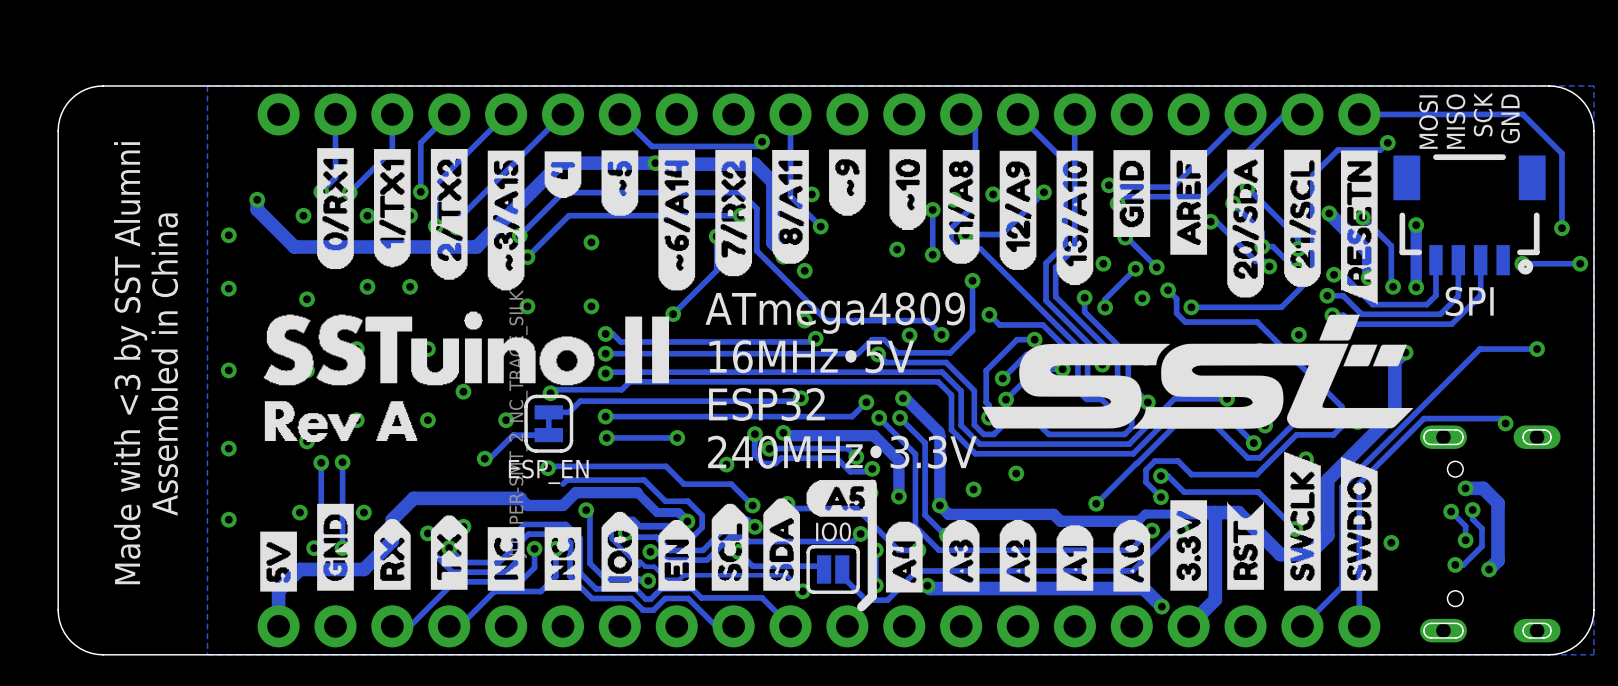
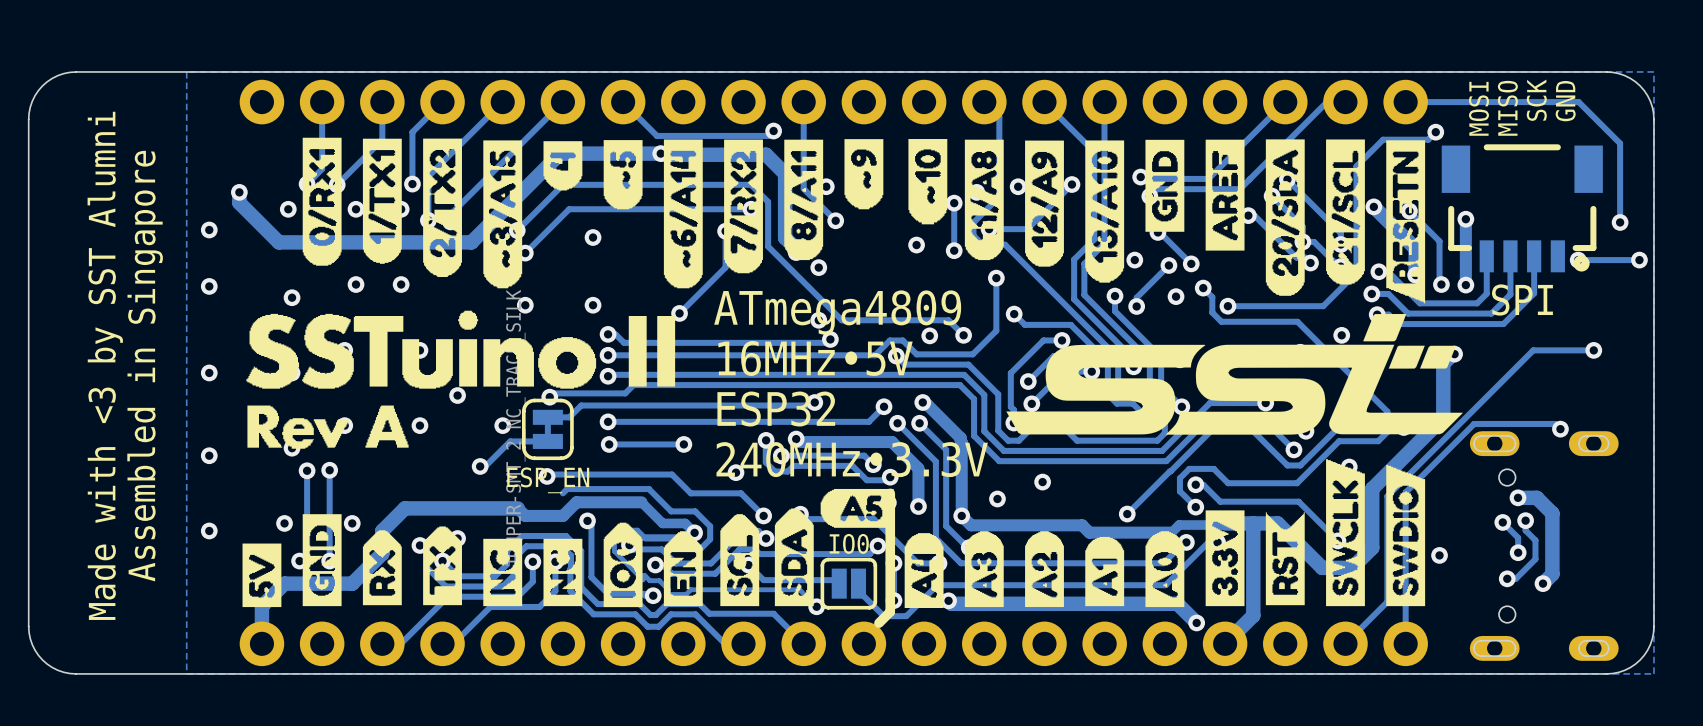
text: Assembled in China (164, 364) -> Assembled in Singapore (145, 366)

